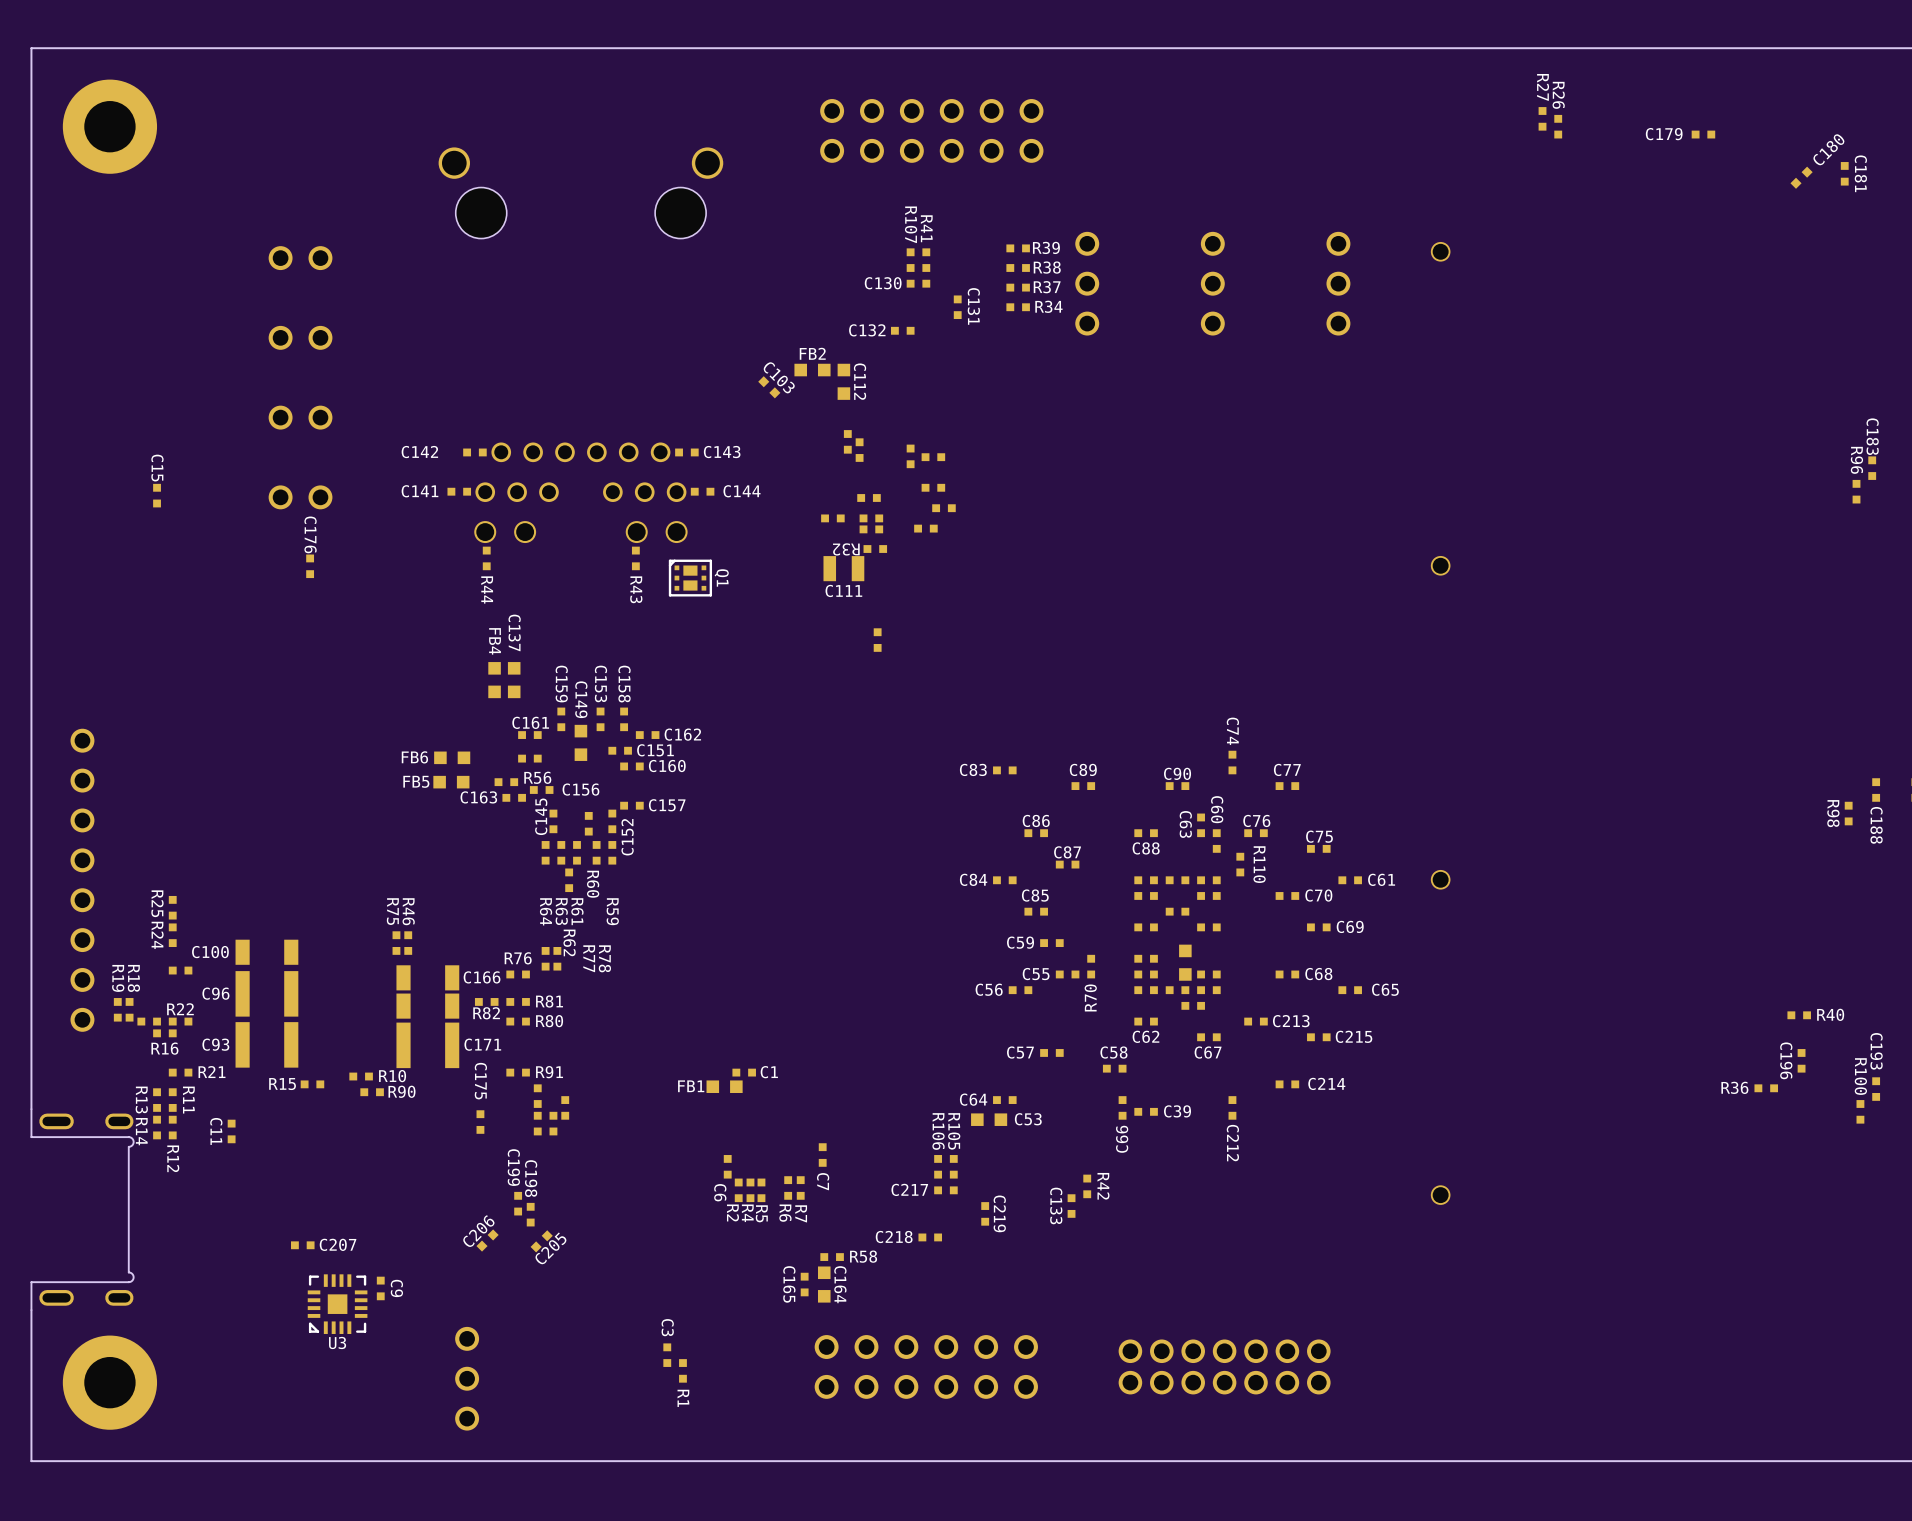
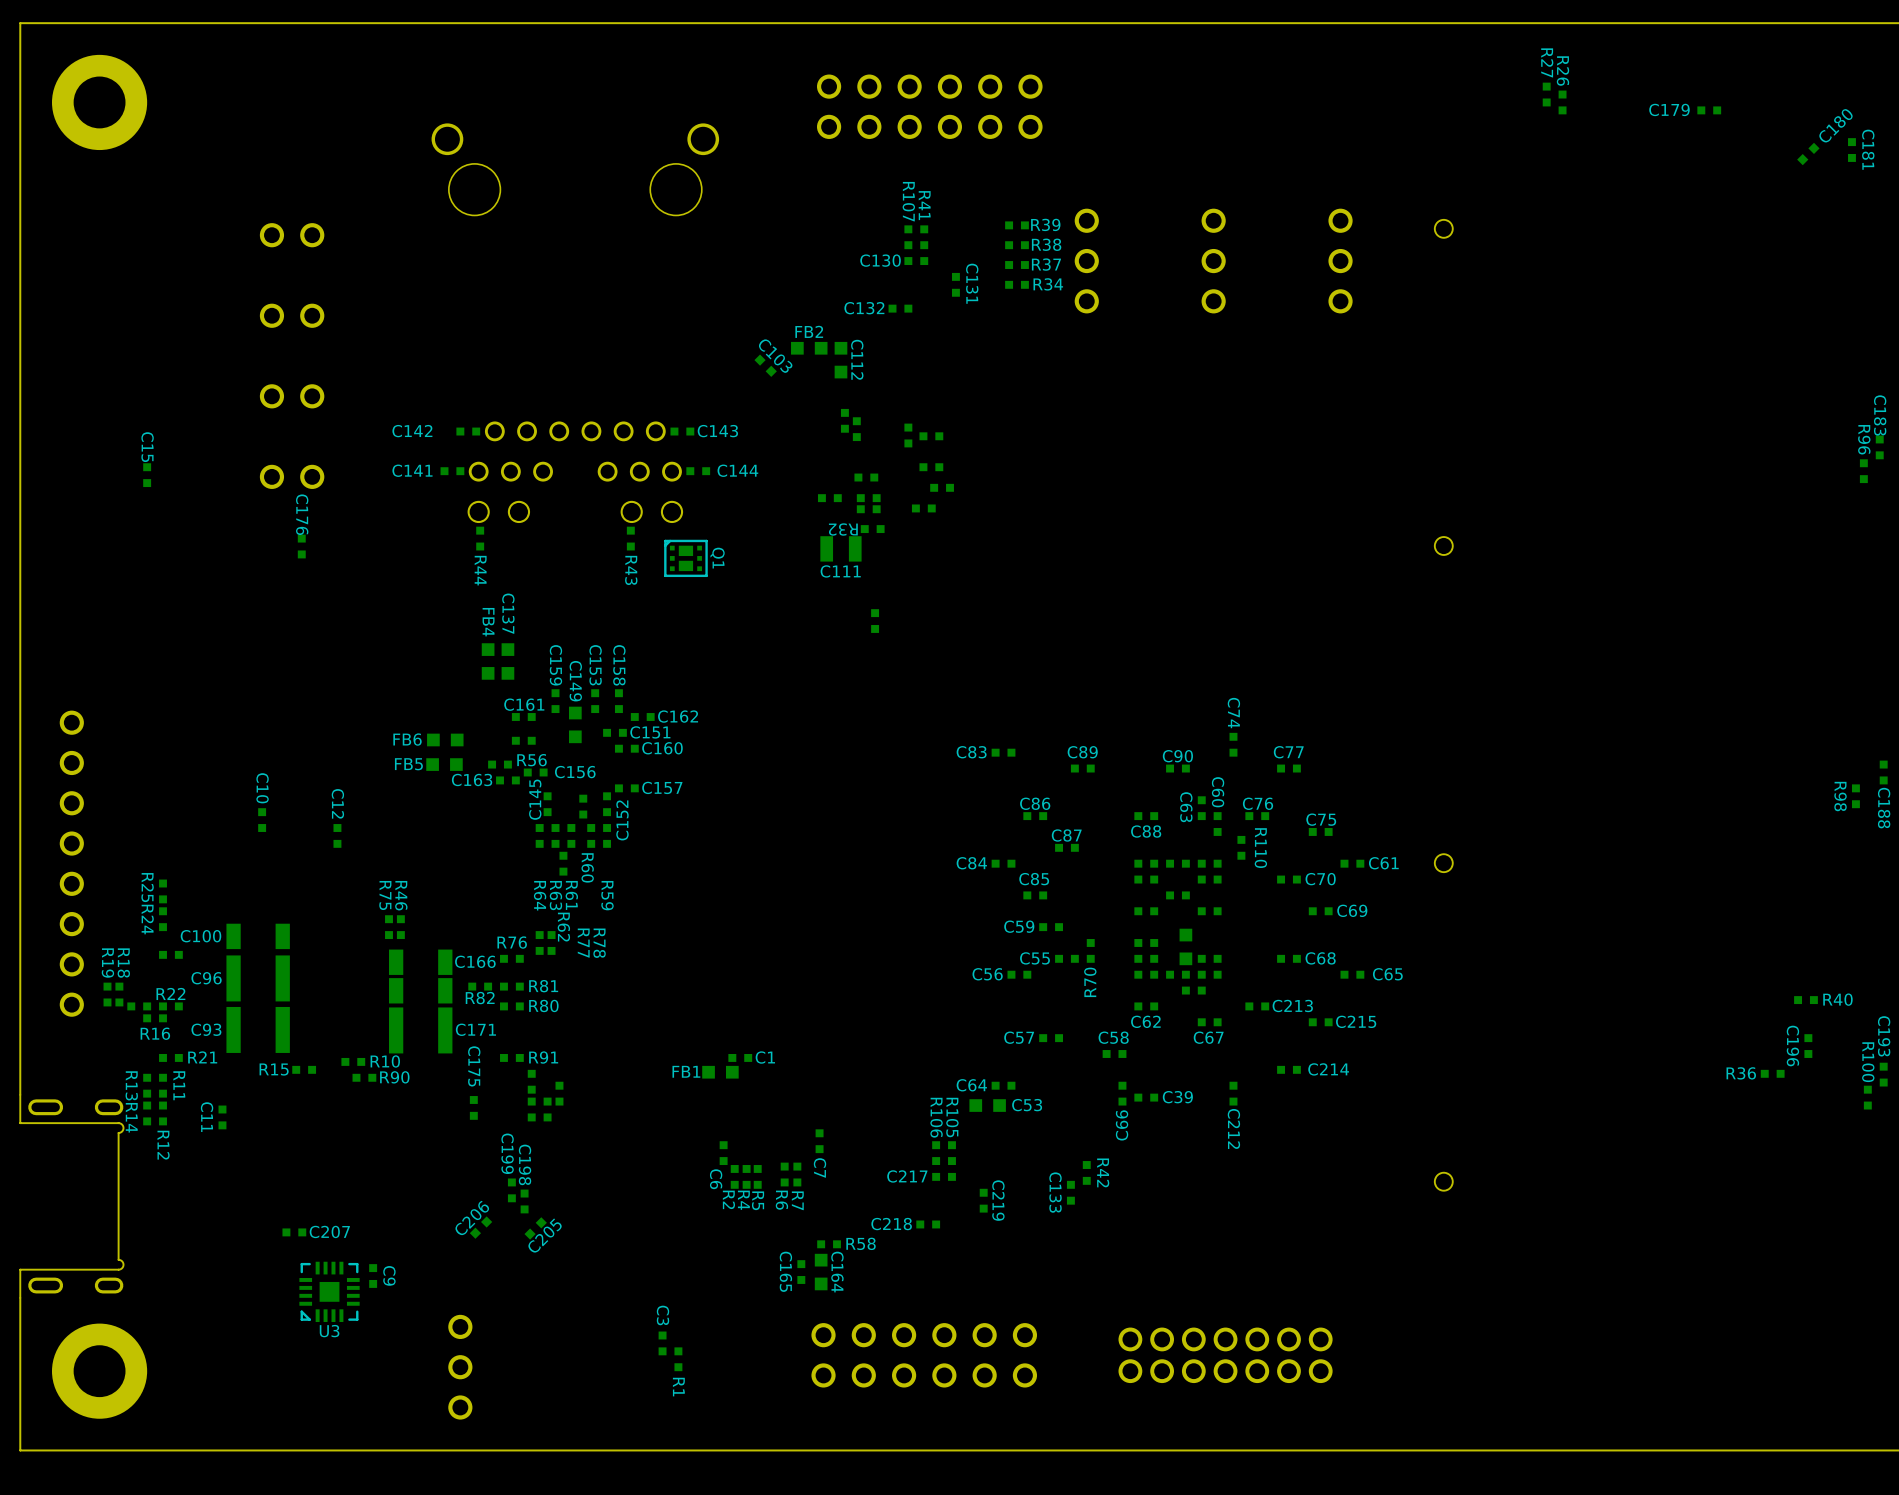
C10: none -> (262, 820)
C12: none -> (337, 835)

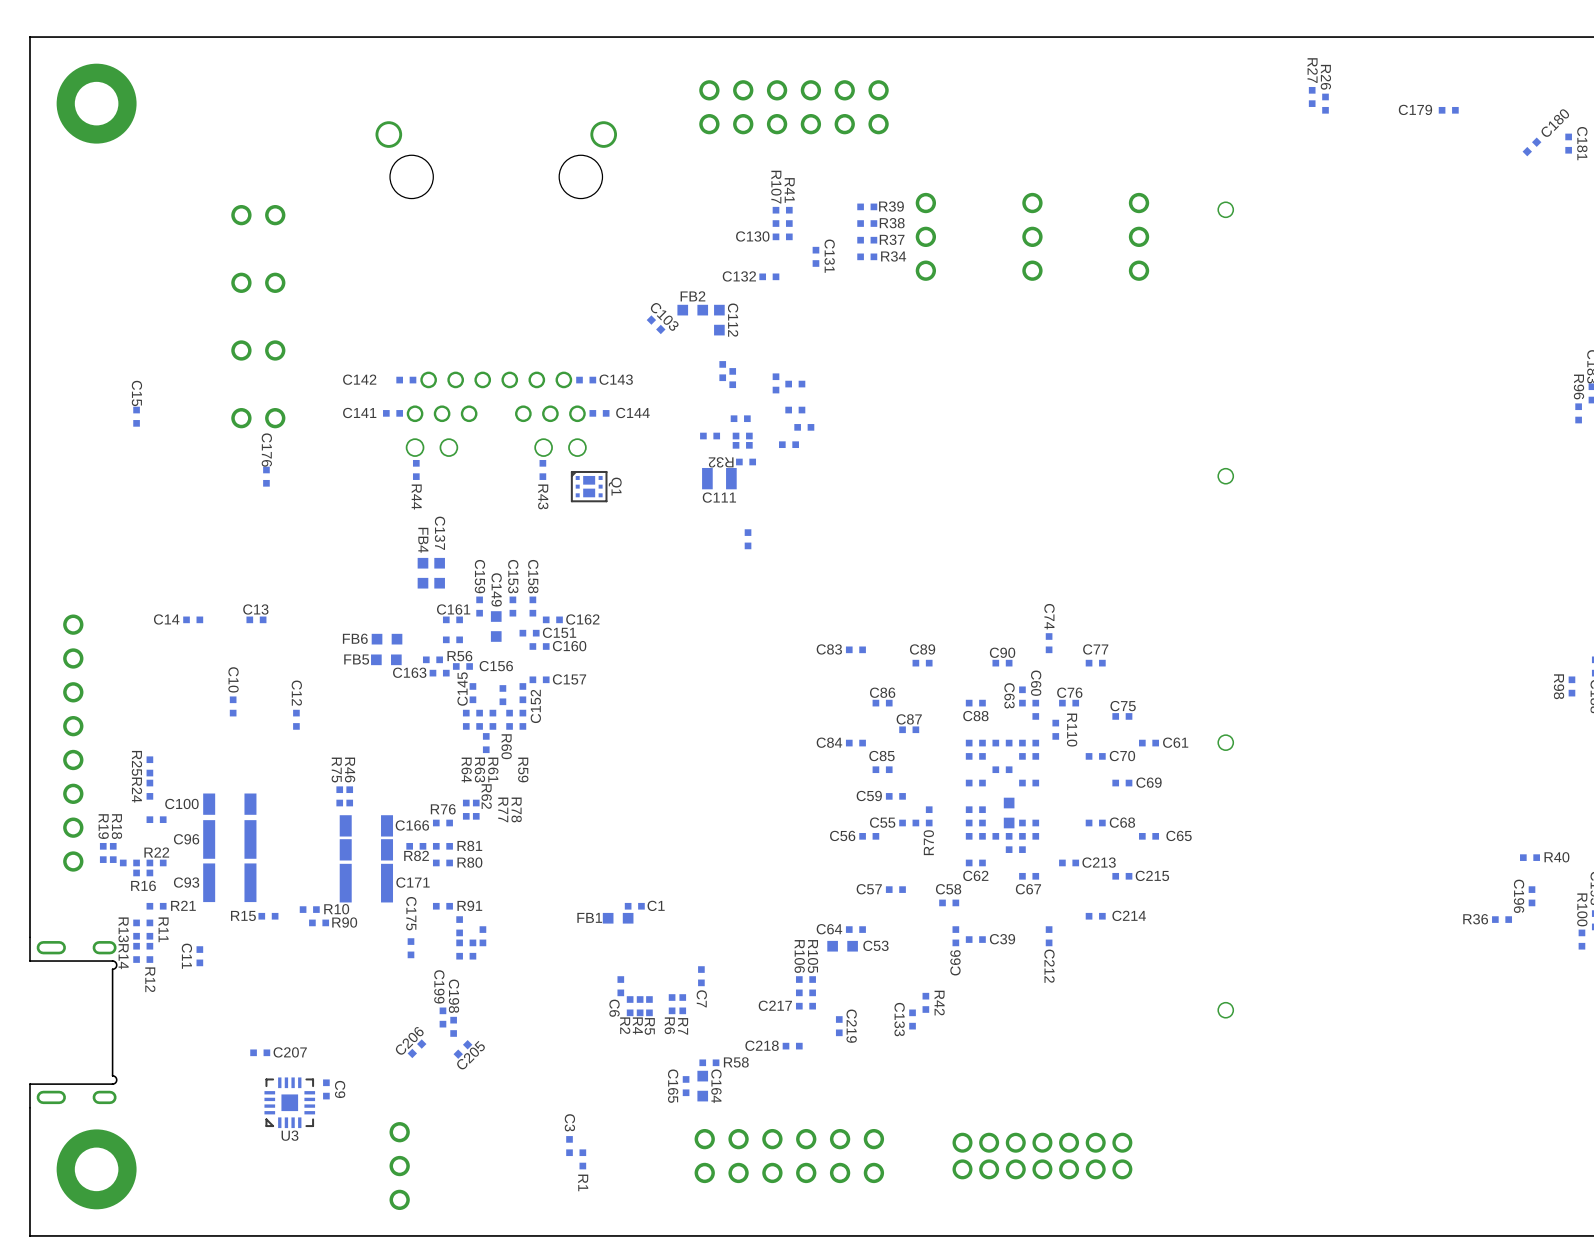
C14: none -> (193, 619)
C13: none -> (256, 619)

